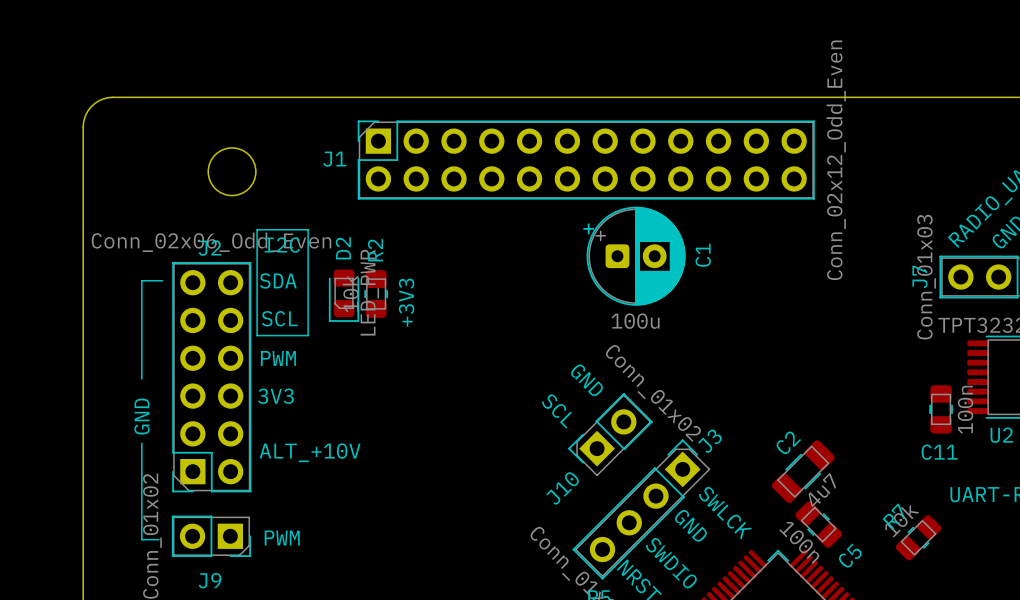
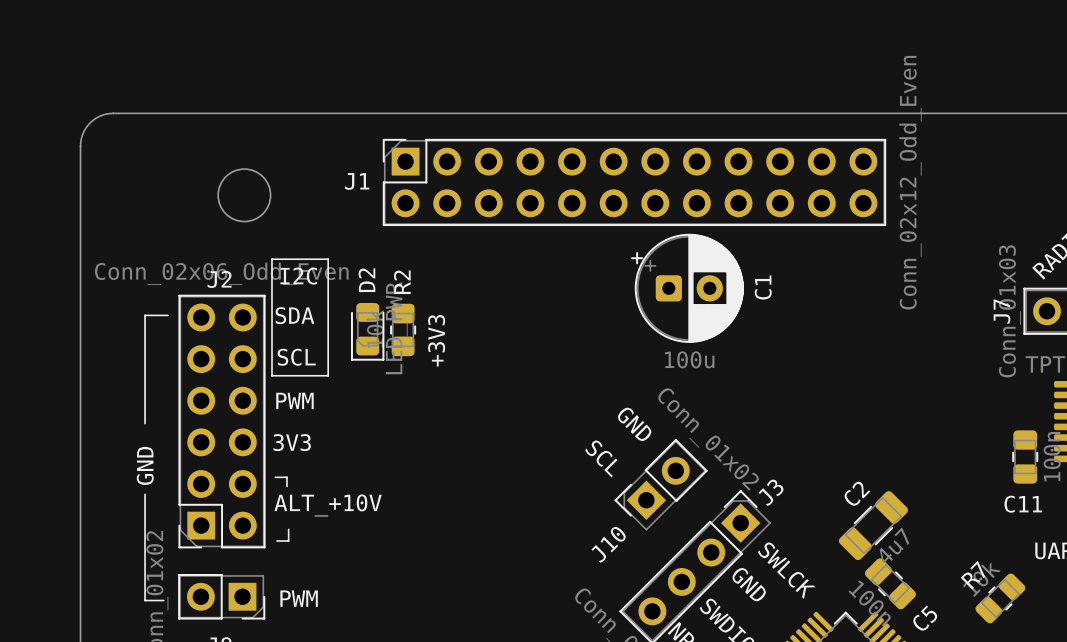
line: none -> (275, 477) (286, 477) (286, 486)
line: none -> (288, 529) (288, 541) (276, 541)

